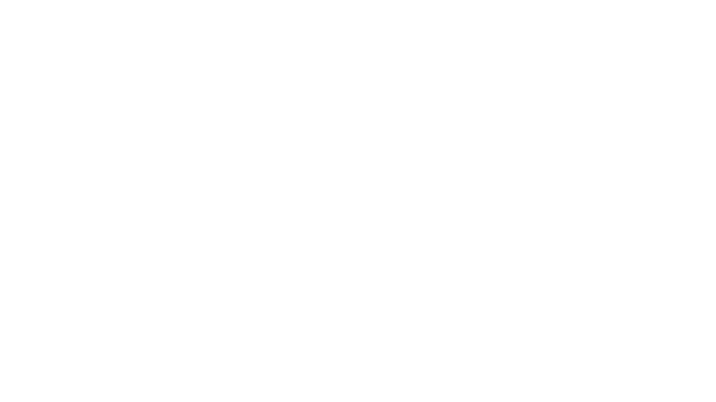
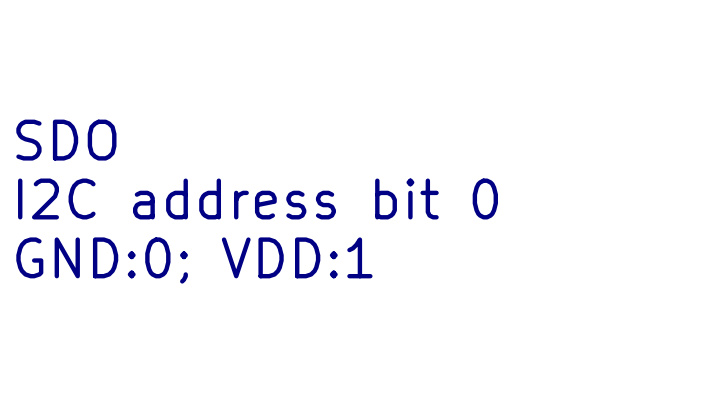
text: none -> SDO (66, 140)
text: none -> I2C address bit 0 (258, 198)
text: none -> GND:0; VDD:1 (194, 260)

